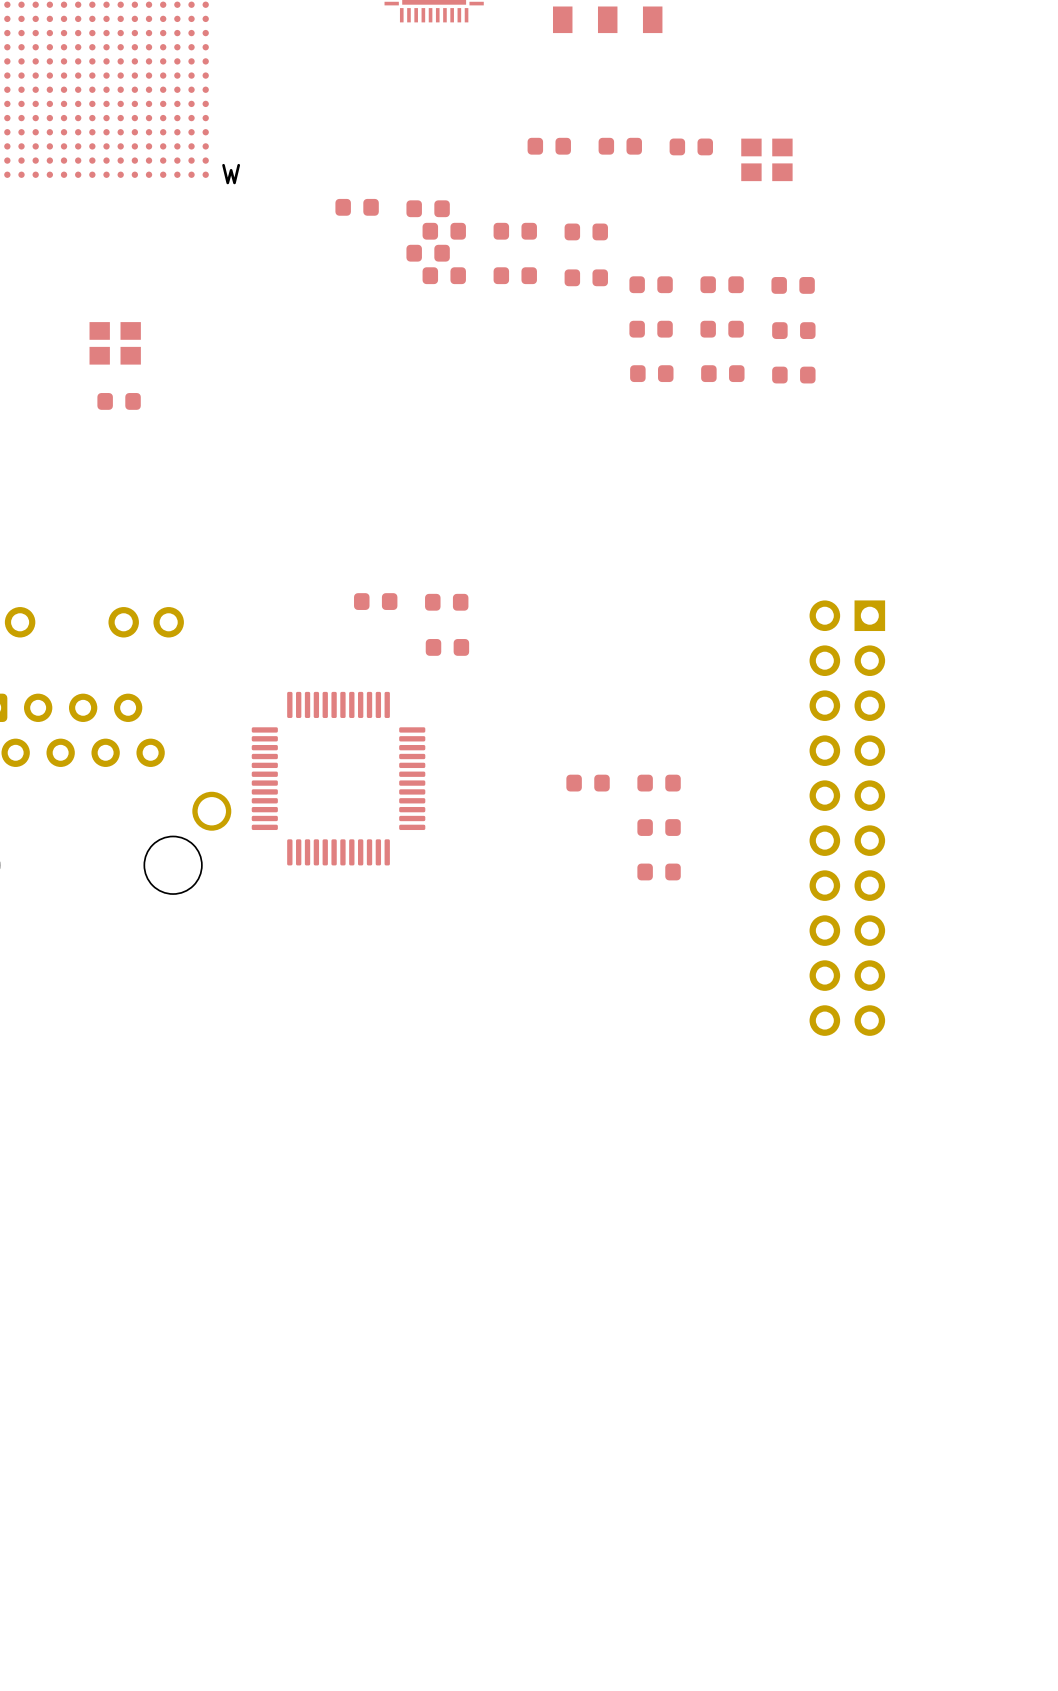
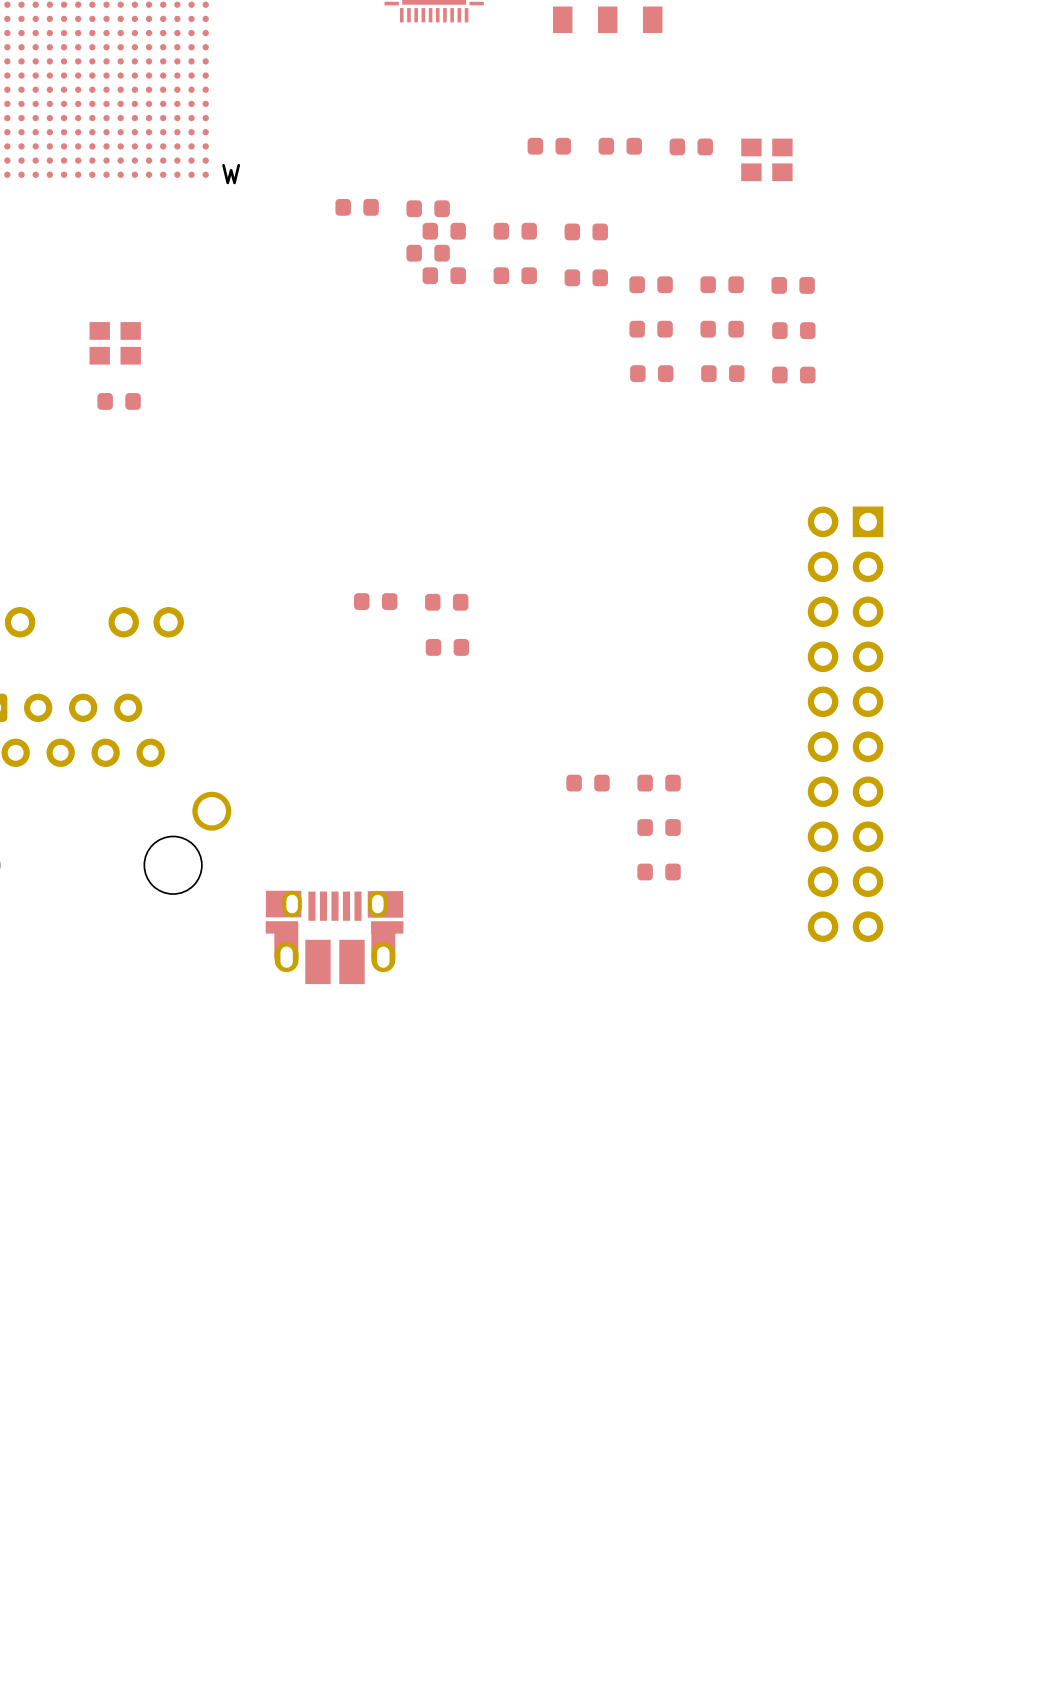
part: (338, 778) -> none
part position: (847, 818) -> (845, 724)
part: none -> (334, 937)

